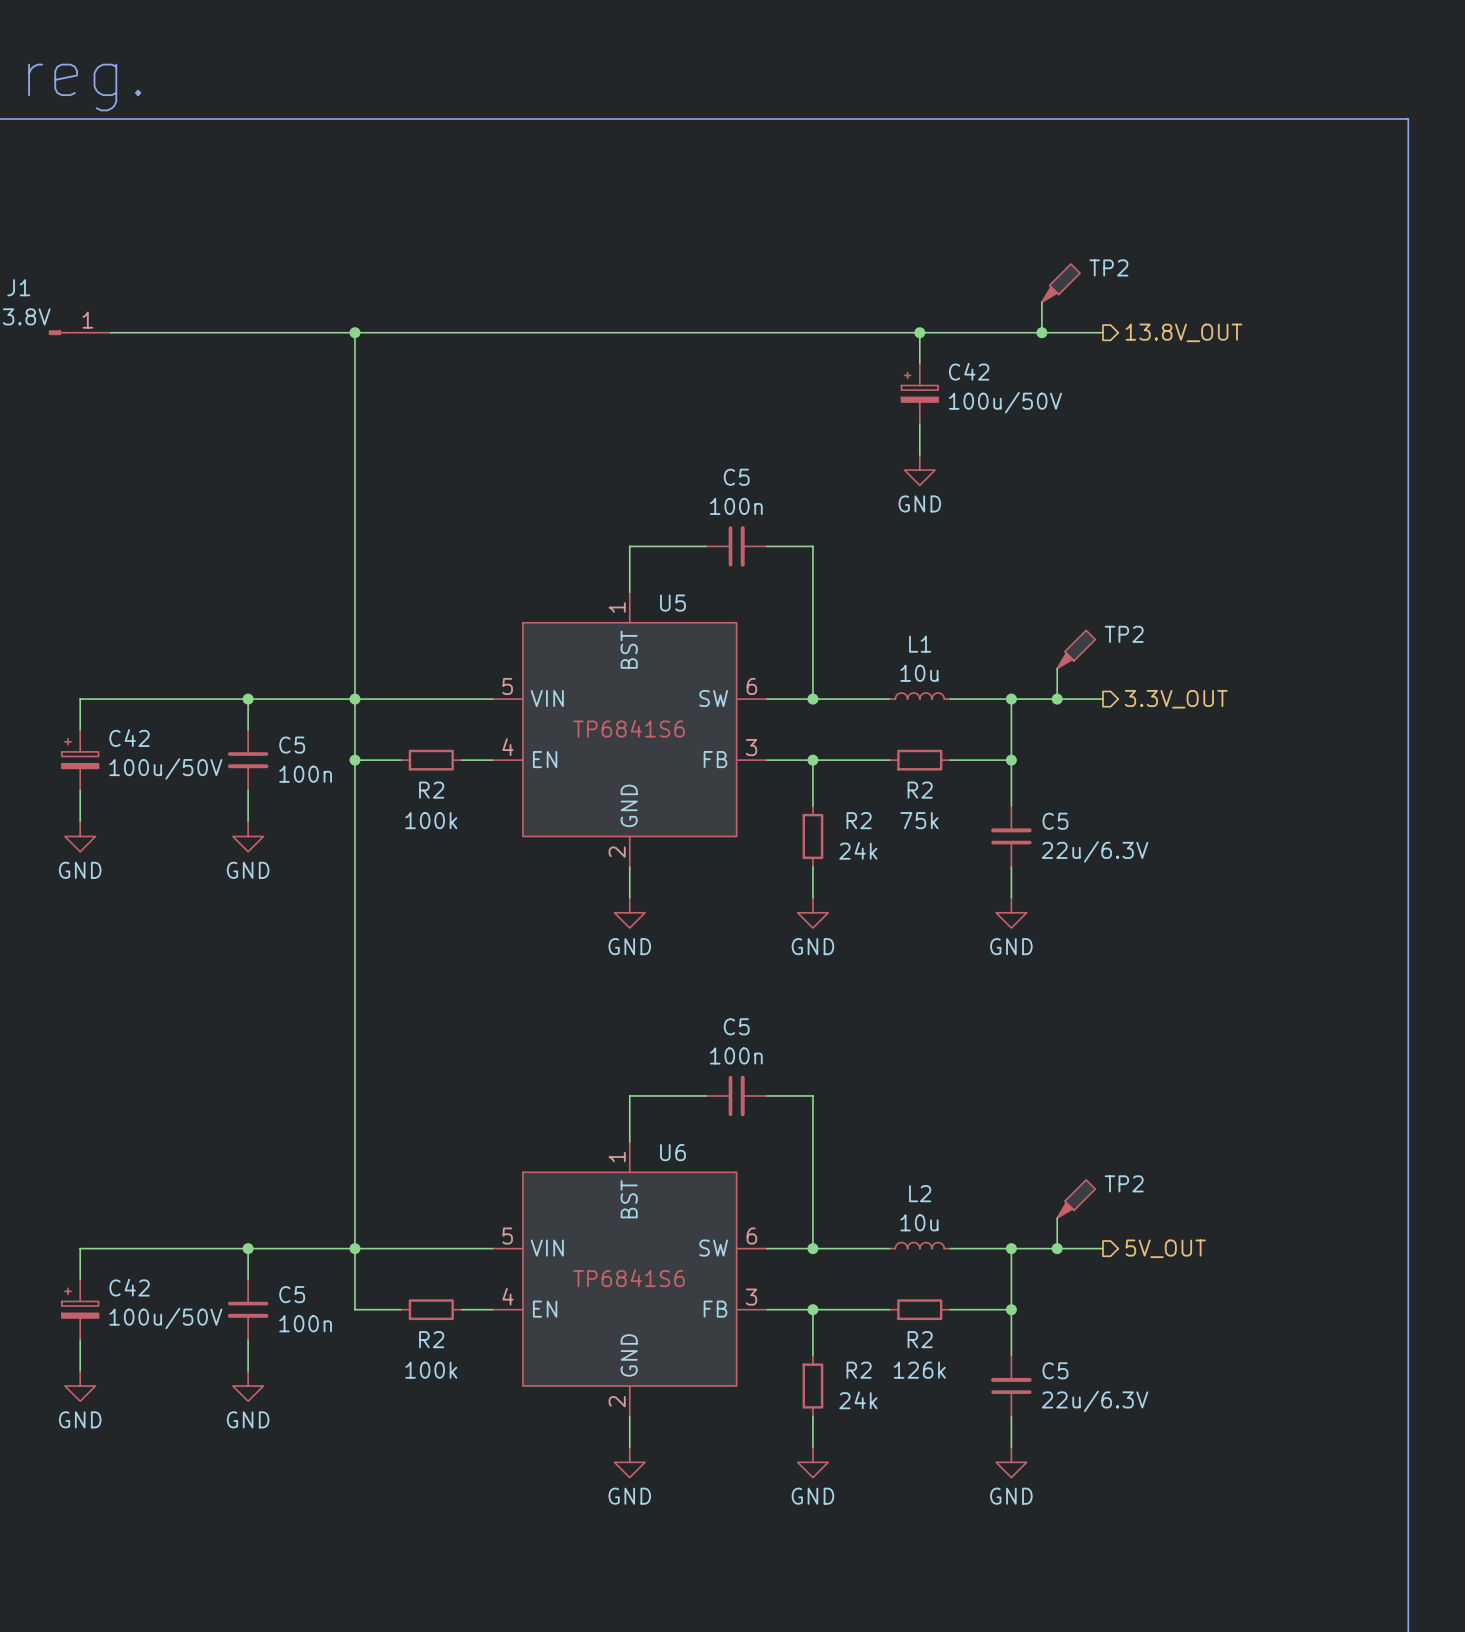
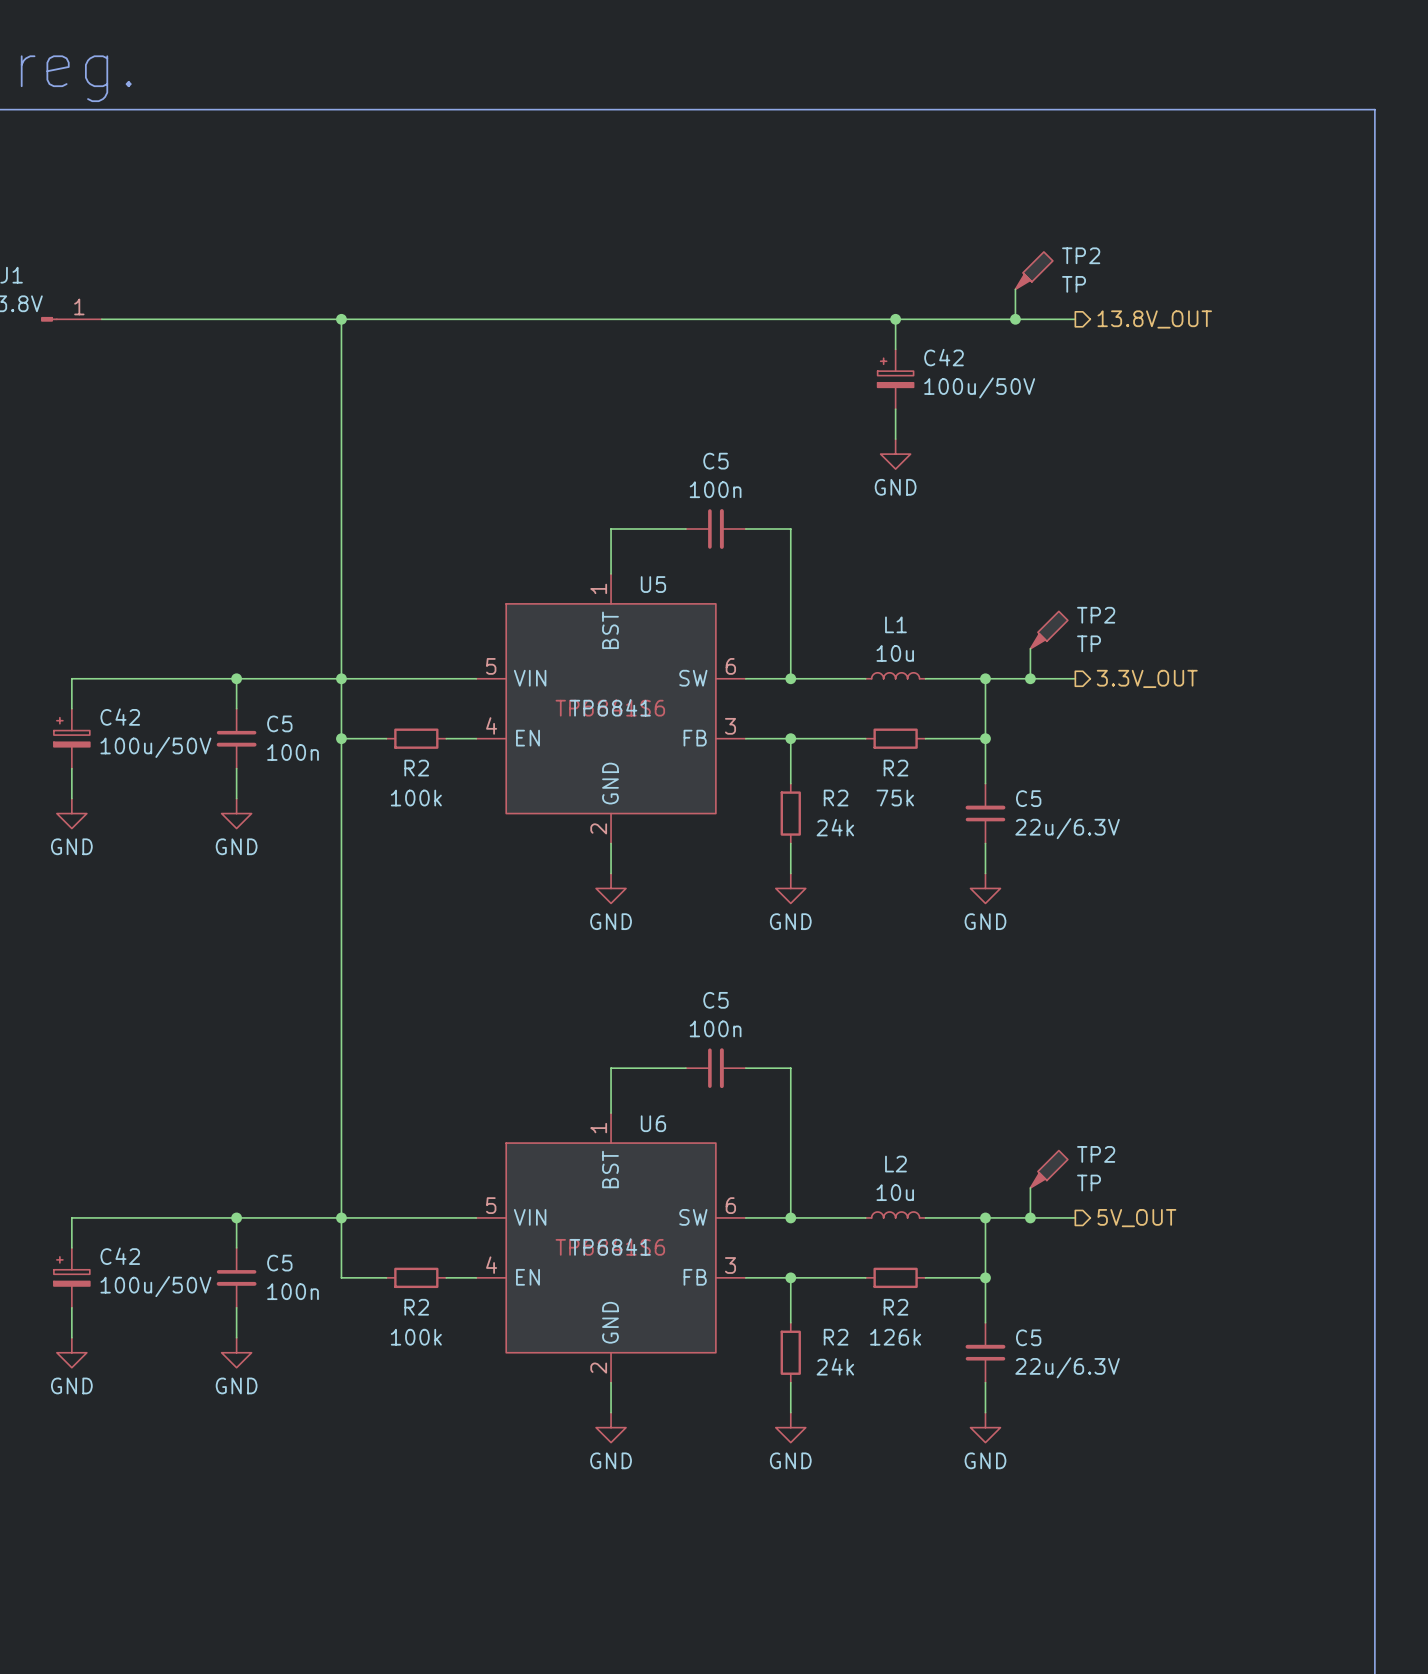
TP2 value: none -> TP (1074, 284)
TP2 value: none -> TP (1089, 643)
U5 value: none -> TP6841 (610, 707)
TP2 value: none -> TP (1089, 1183)
U6 value: none -> TP6841 (610, 1246)

